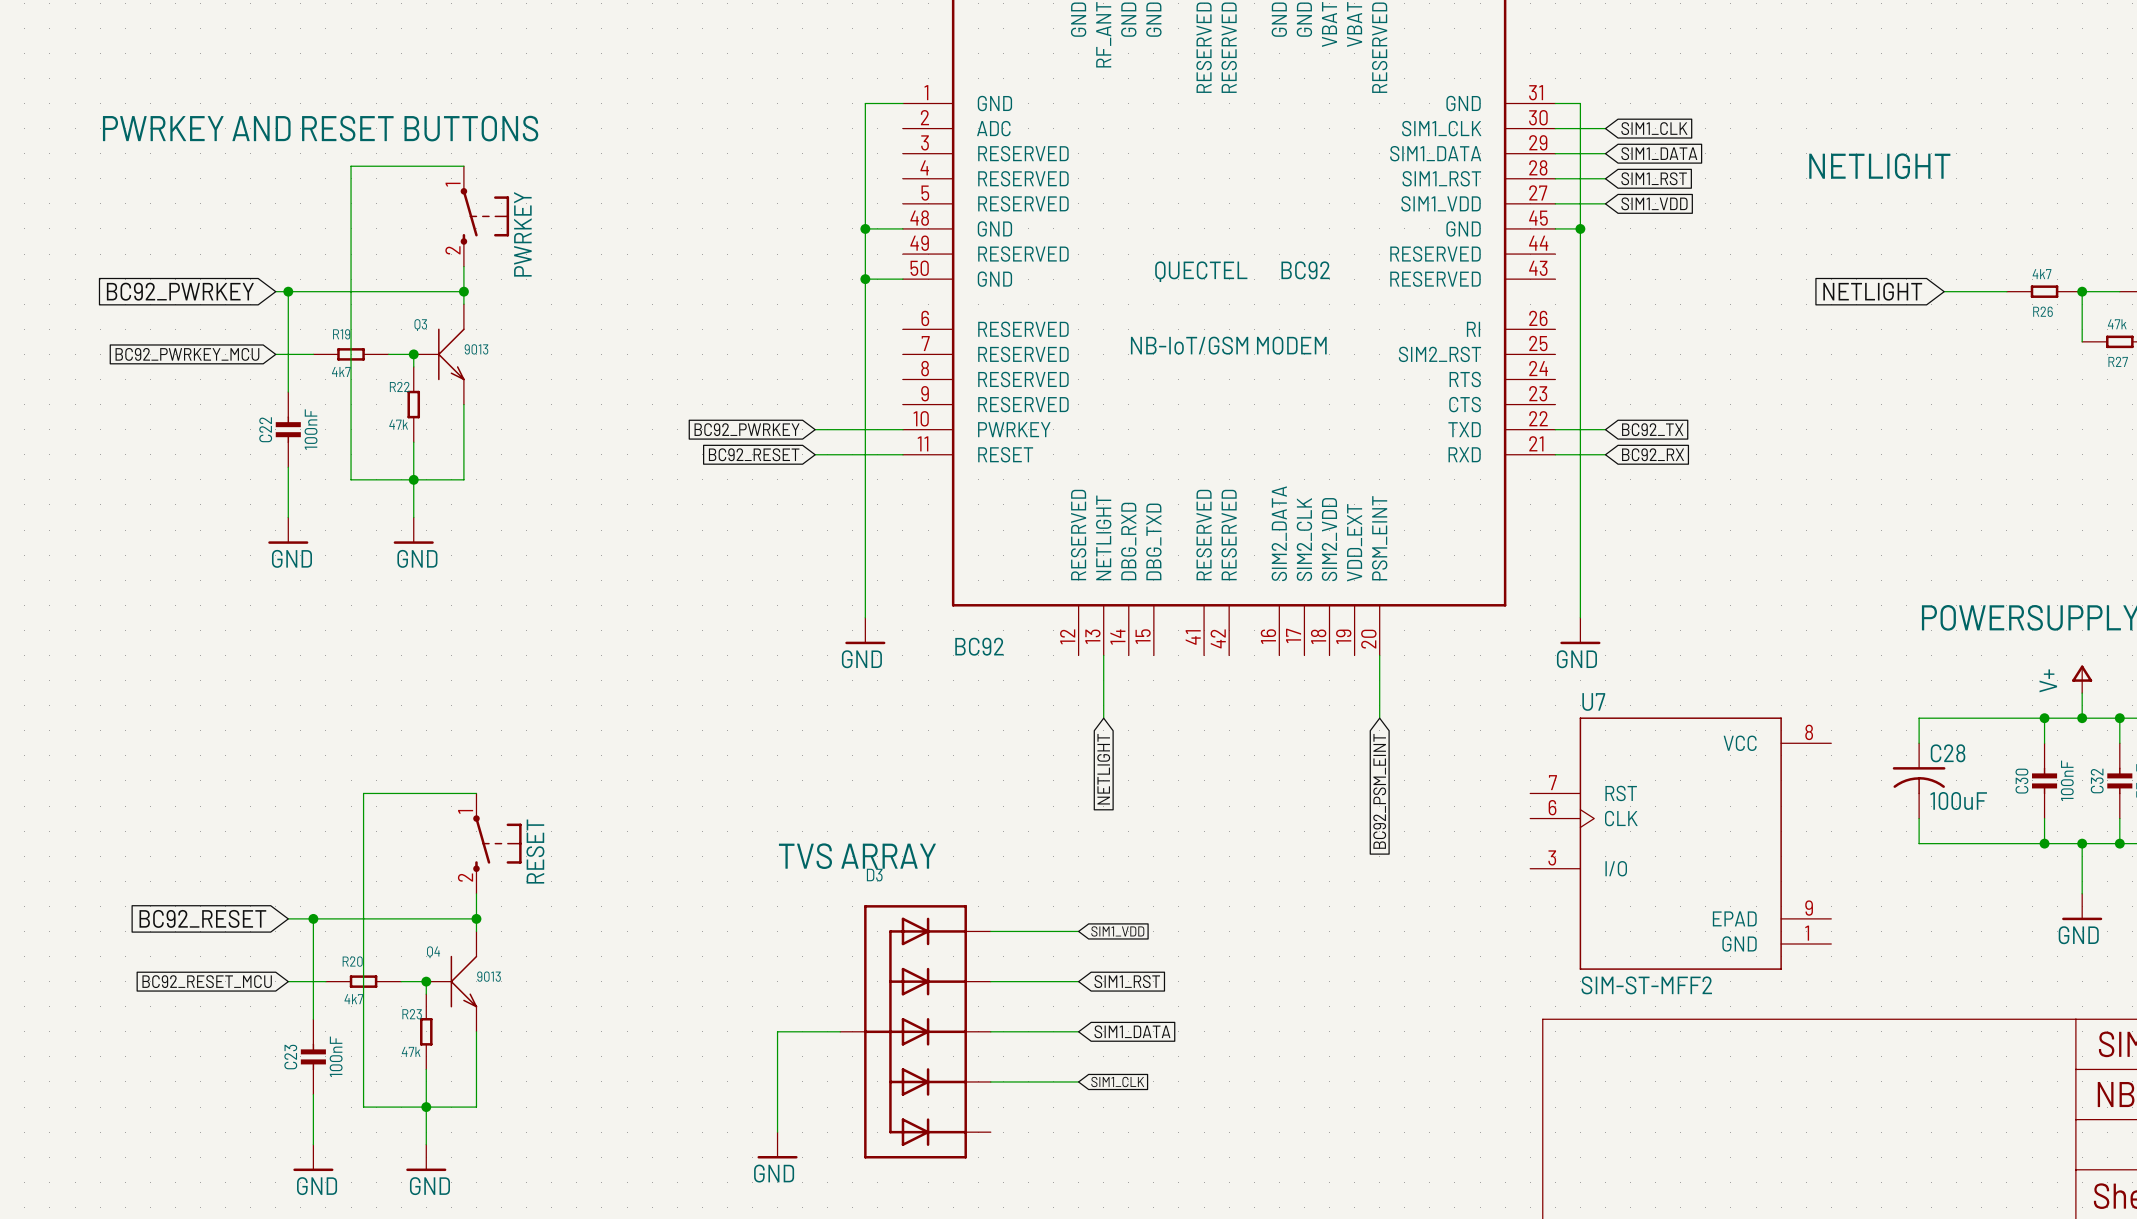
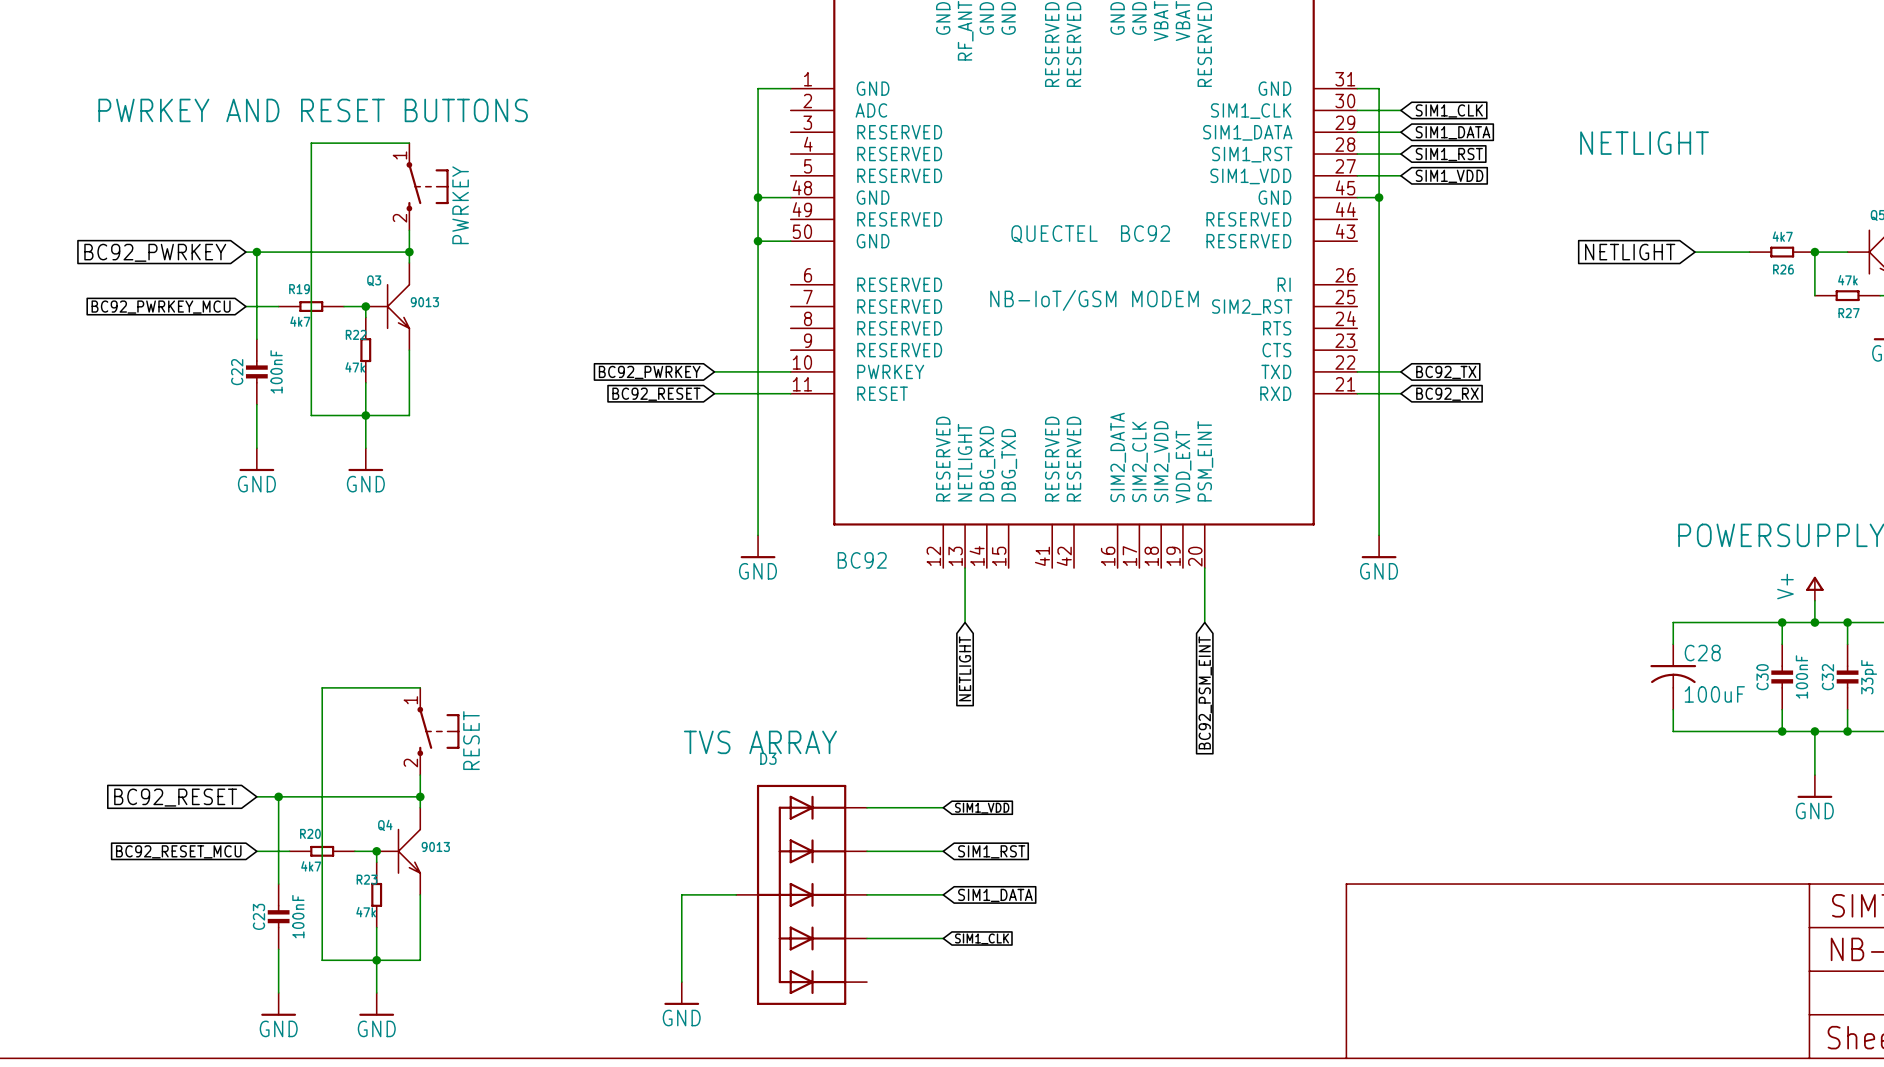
U7: SIM-ST-MFF2 (1680, 843) -> none

